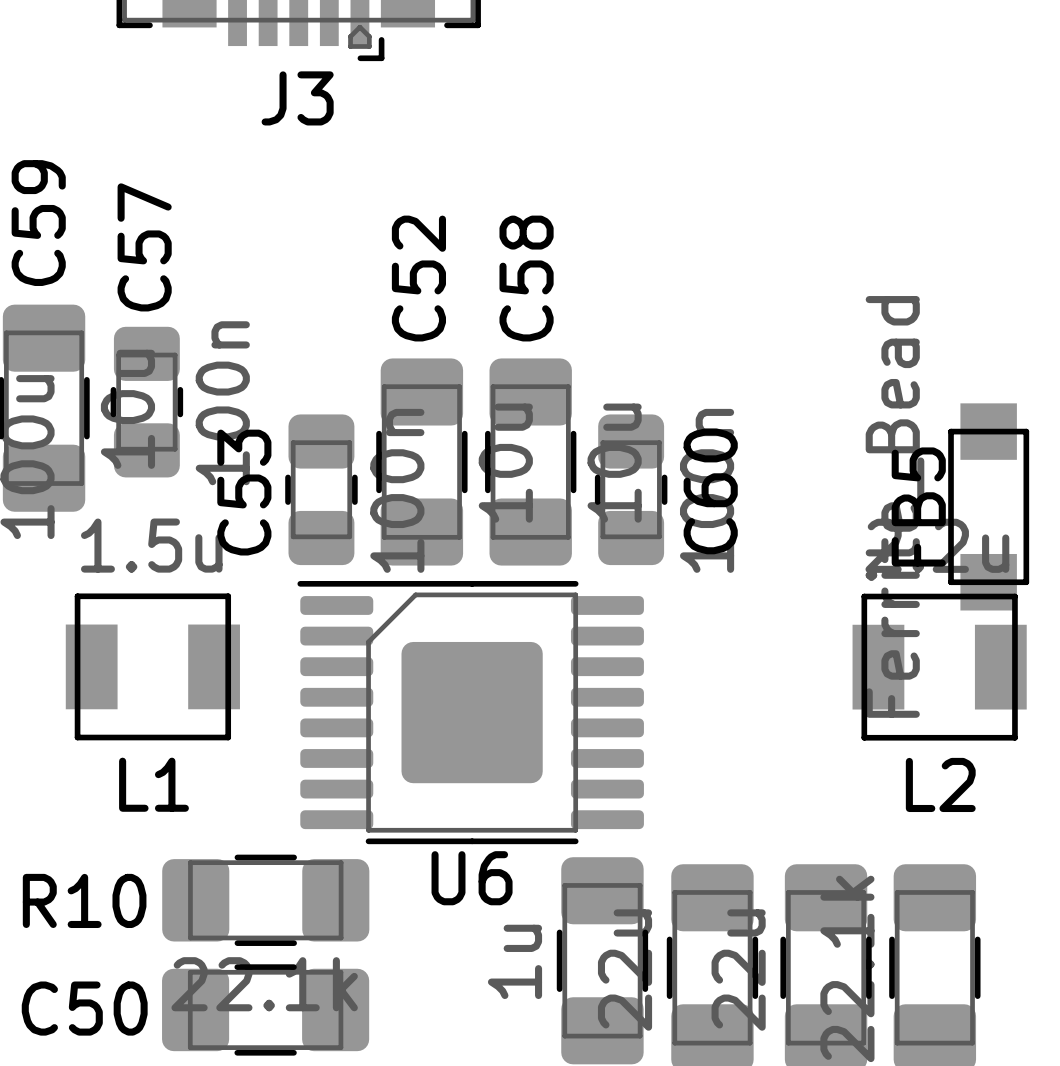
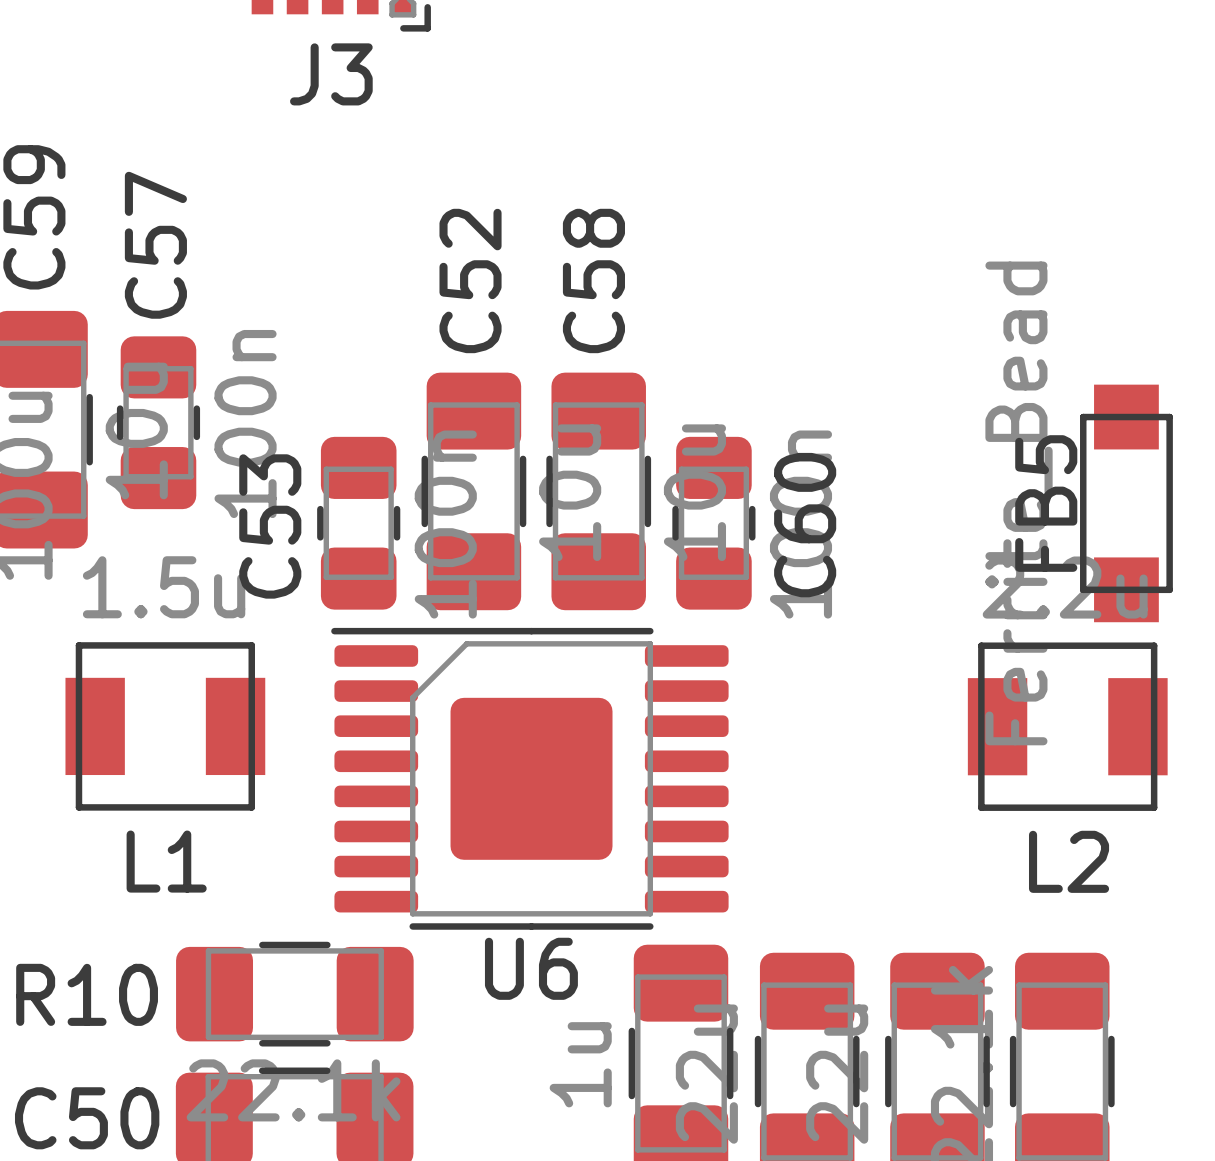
FB5 position: (988, 506) -> (1126, 503)

